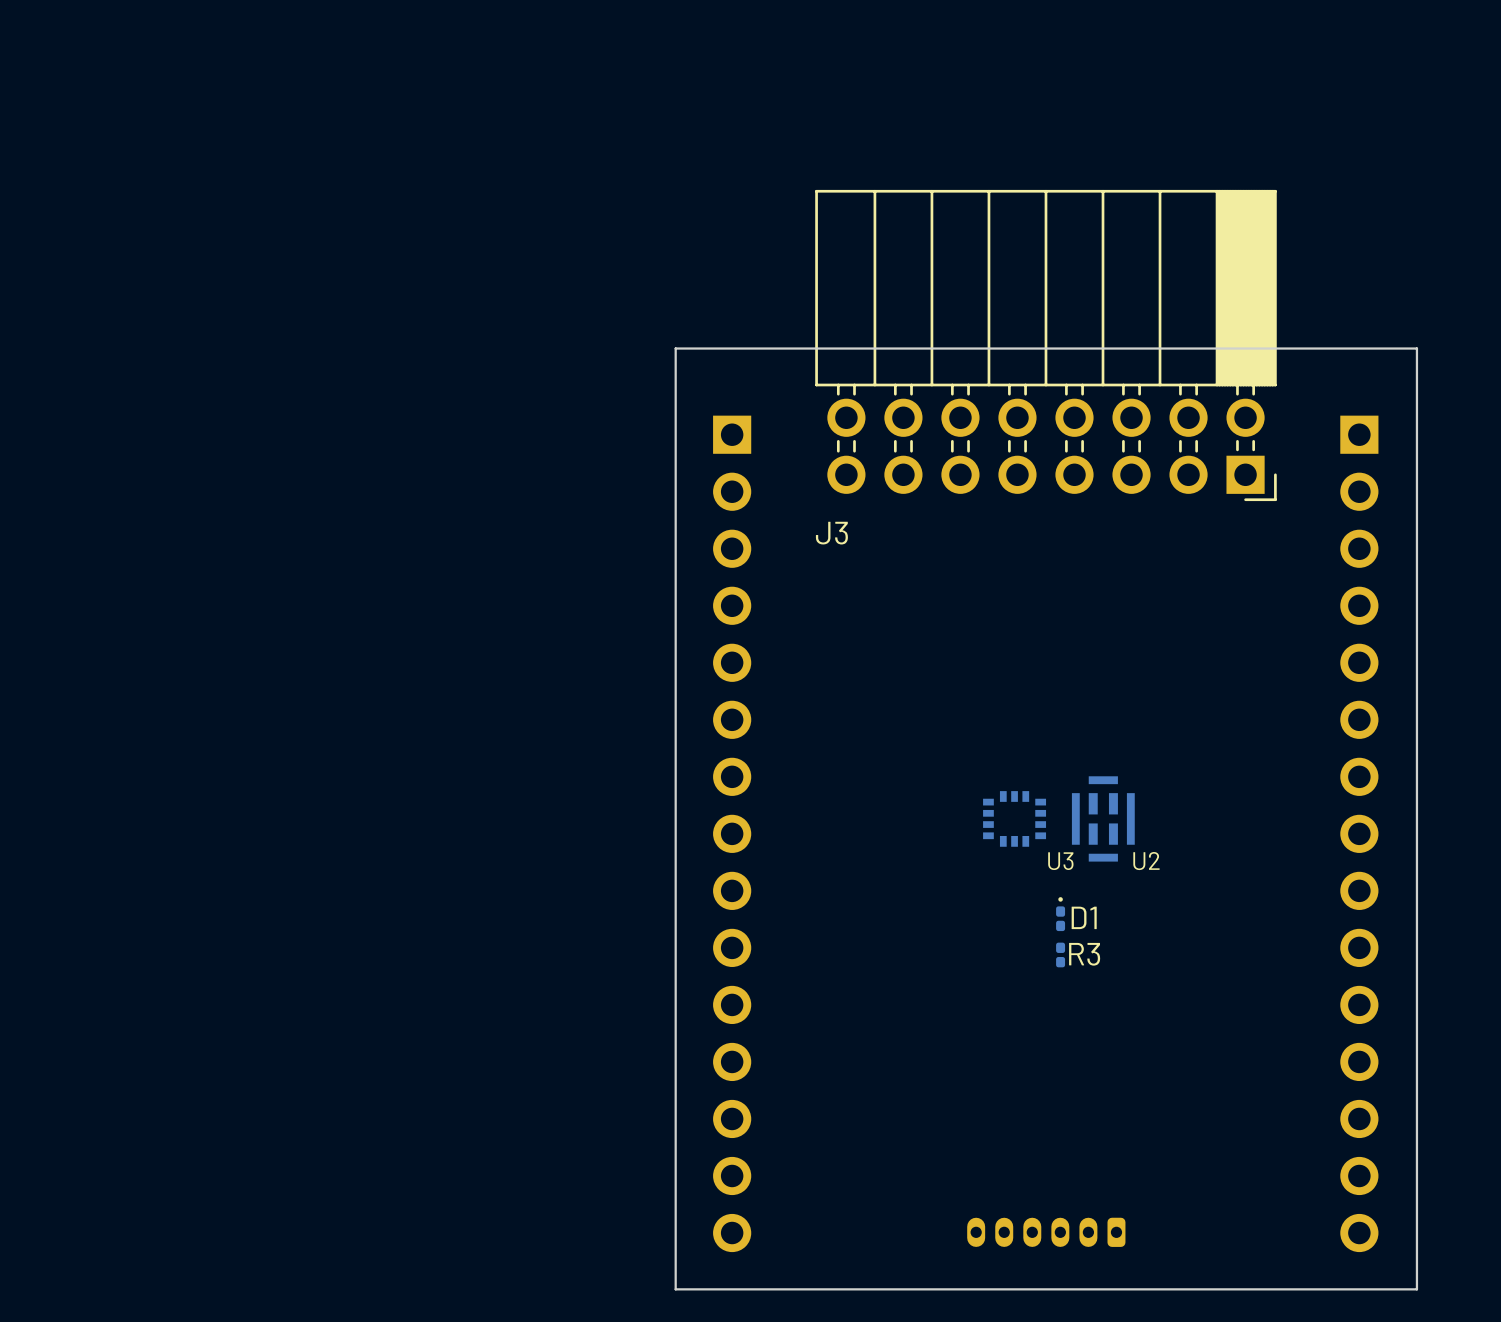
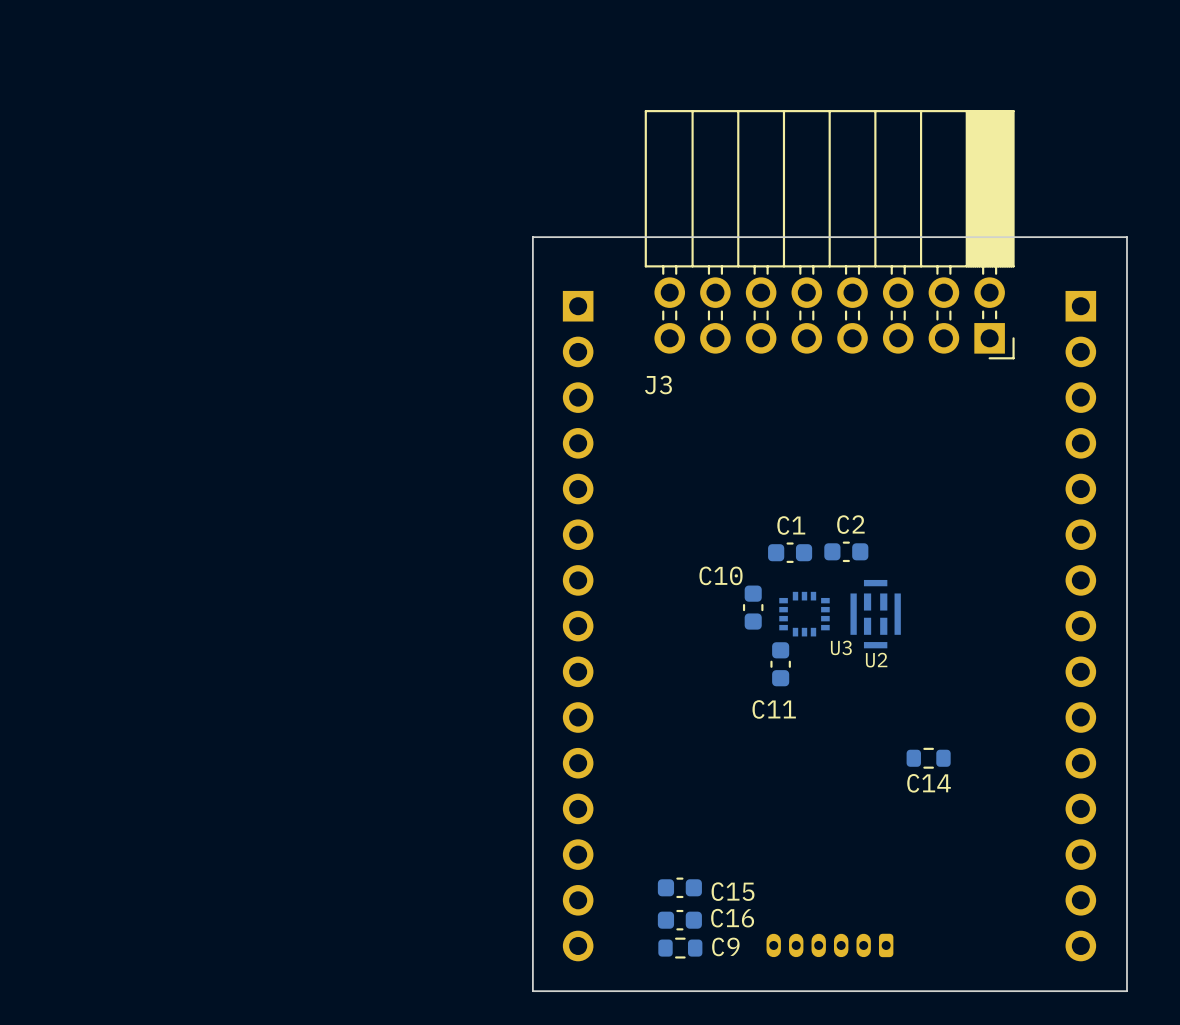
C2: none -> (846, 551)
C1: none -> (790, 552)
C10: none -> (753, 607)
U2 name position: U2 (1146, 861) -> U2 (876, 660)
C11: none -> (780, 664)
D1: (1060, 914) -> none
R3: (1060, 954) -> none
C14: none -> (928, 758)
C15: none -> (679, 887)
C16: none -> (679, 920)
C9: none -> (680, 948)

